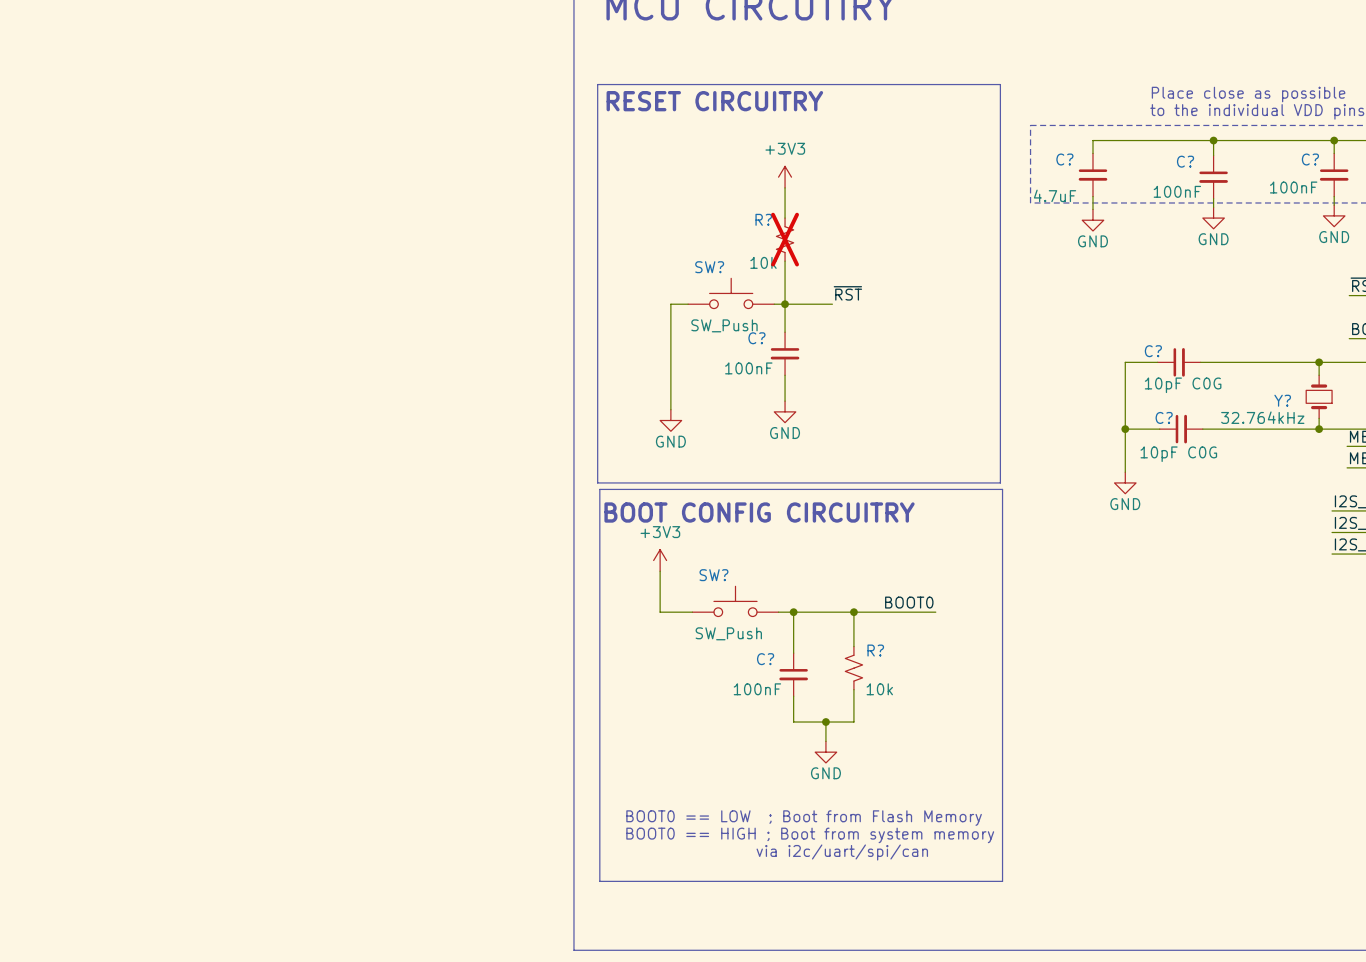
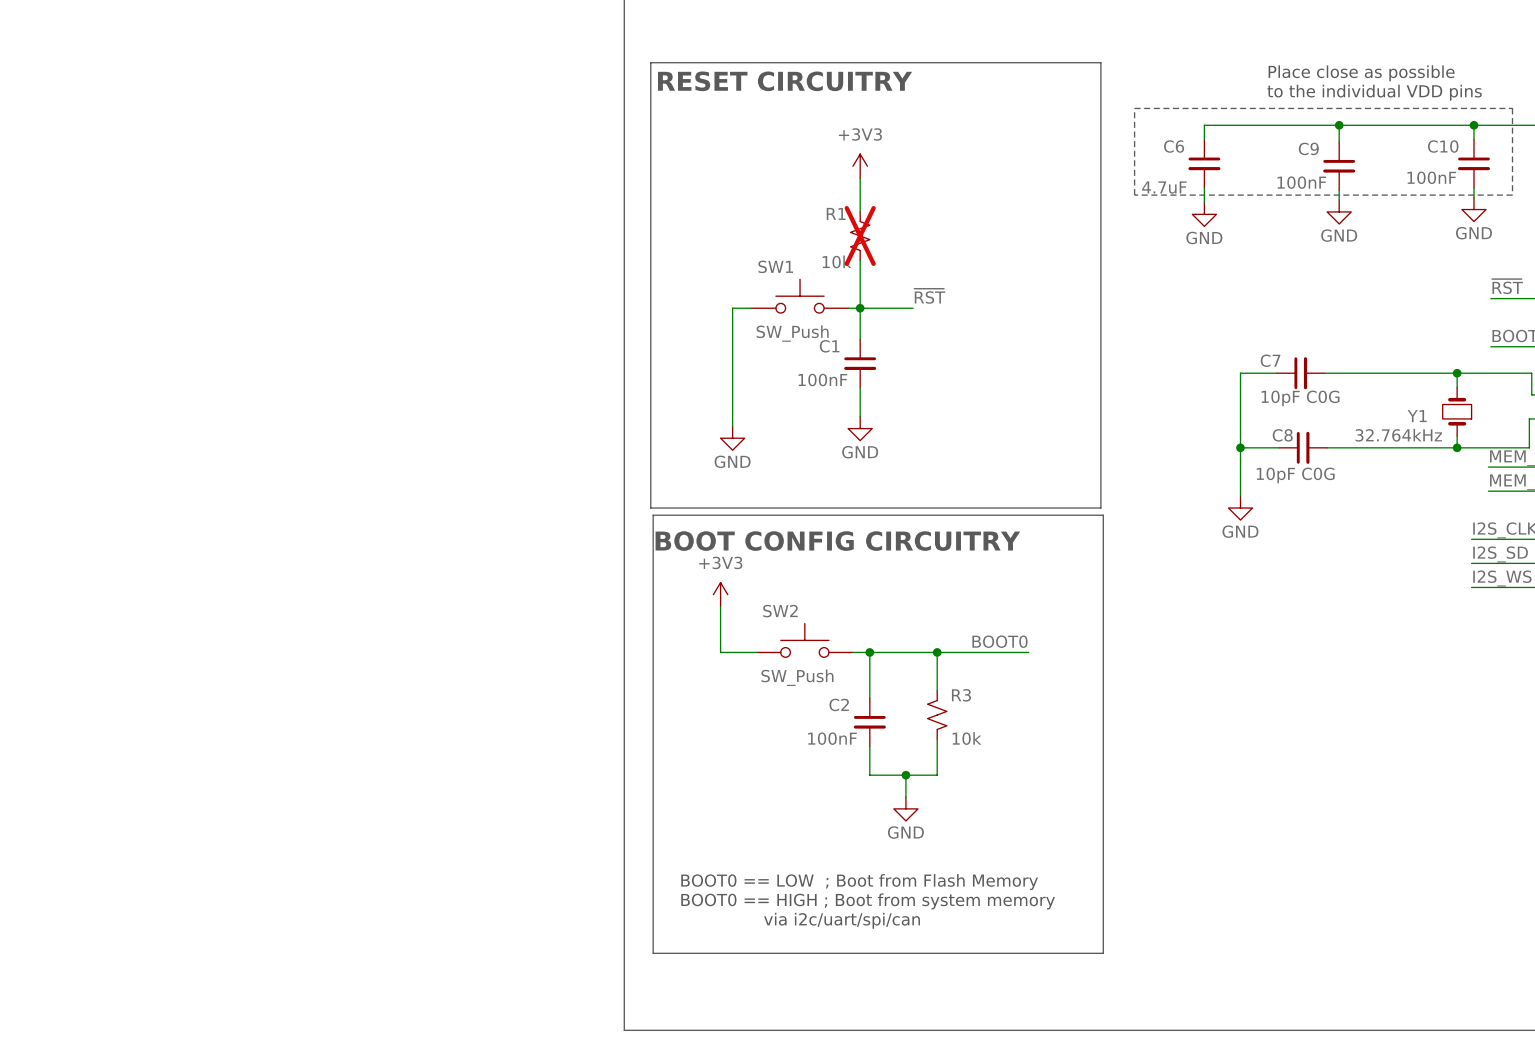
C? name: C? (1064, 159) -> C6 (1174, 146)
C? name: C? (1310, 159) -> C10 (1443, 146)
C? name: C? (1185, 161) -> C9 (1308, 148)
R? name: R? (763, 219) -> R1 (836, 213)
SW? name: SW? (709, 267) -> SW1 (775, 266)
C? name: C? (756, 338) -> C1 (829, 346)
C? name: C? (1153, 351) -> C7 (1270, 360)
Y? name: Y? (1282, 400) -> Y1 (1417, 416)
C? name: C? (1164, 417) -> C8 (1282, 435)
SW? name: SW? (713, 575) -> SW2 (780, 611)
R? name: R? (875, 650) -> R3 (961, 695)
C? name: C? (765, 659) -> C2 (839, 704)

